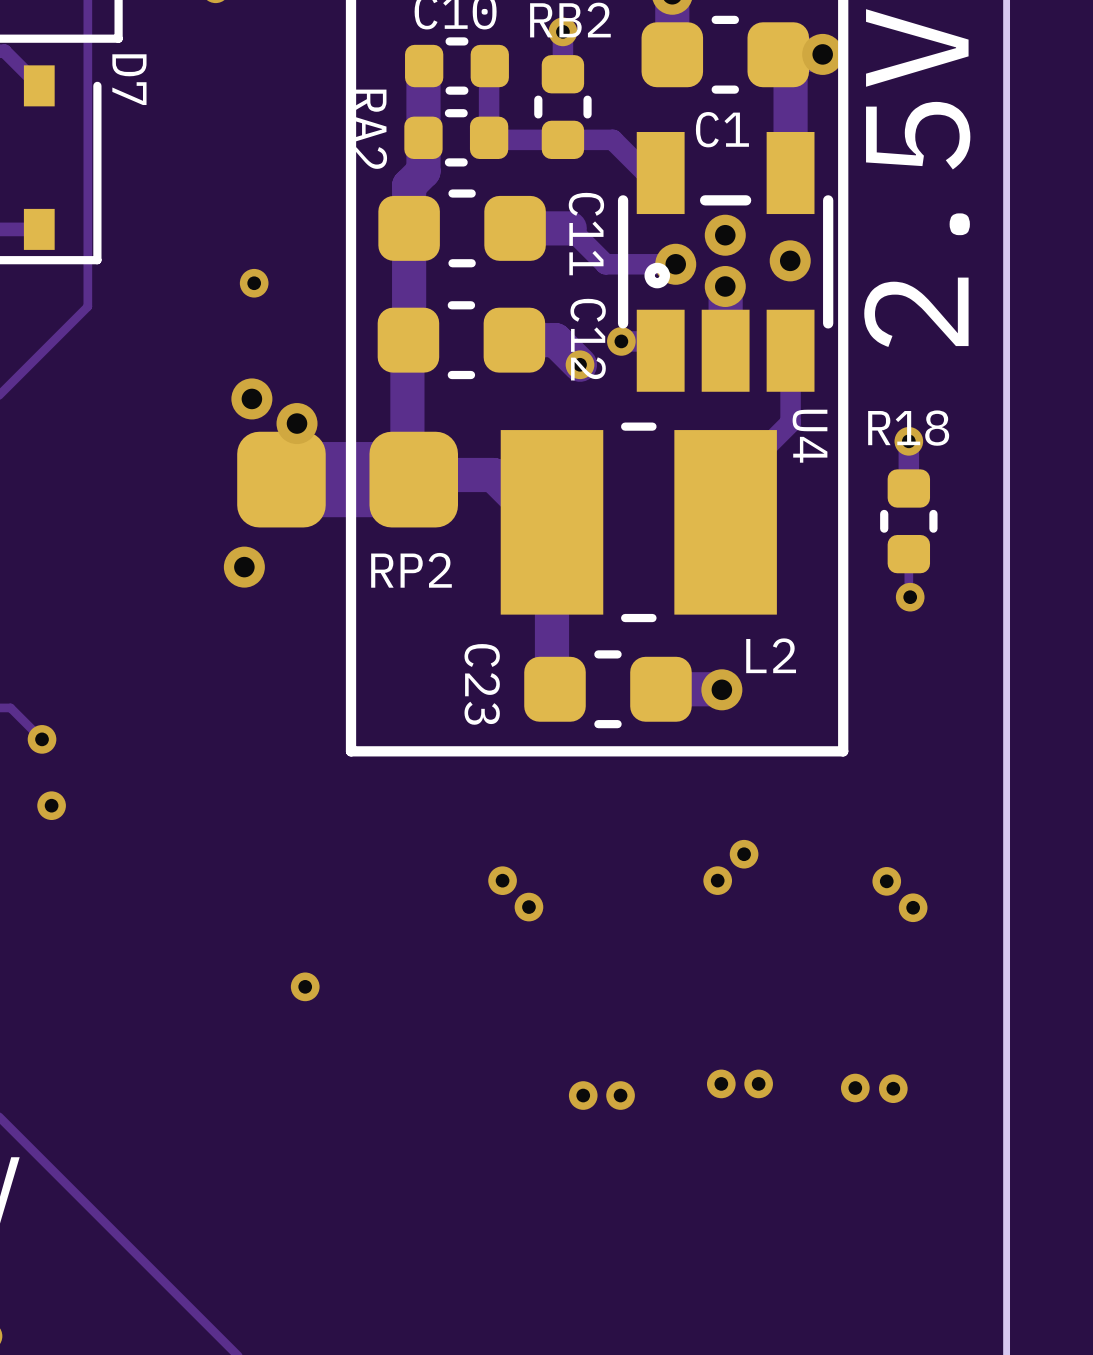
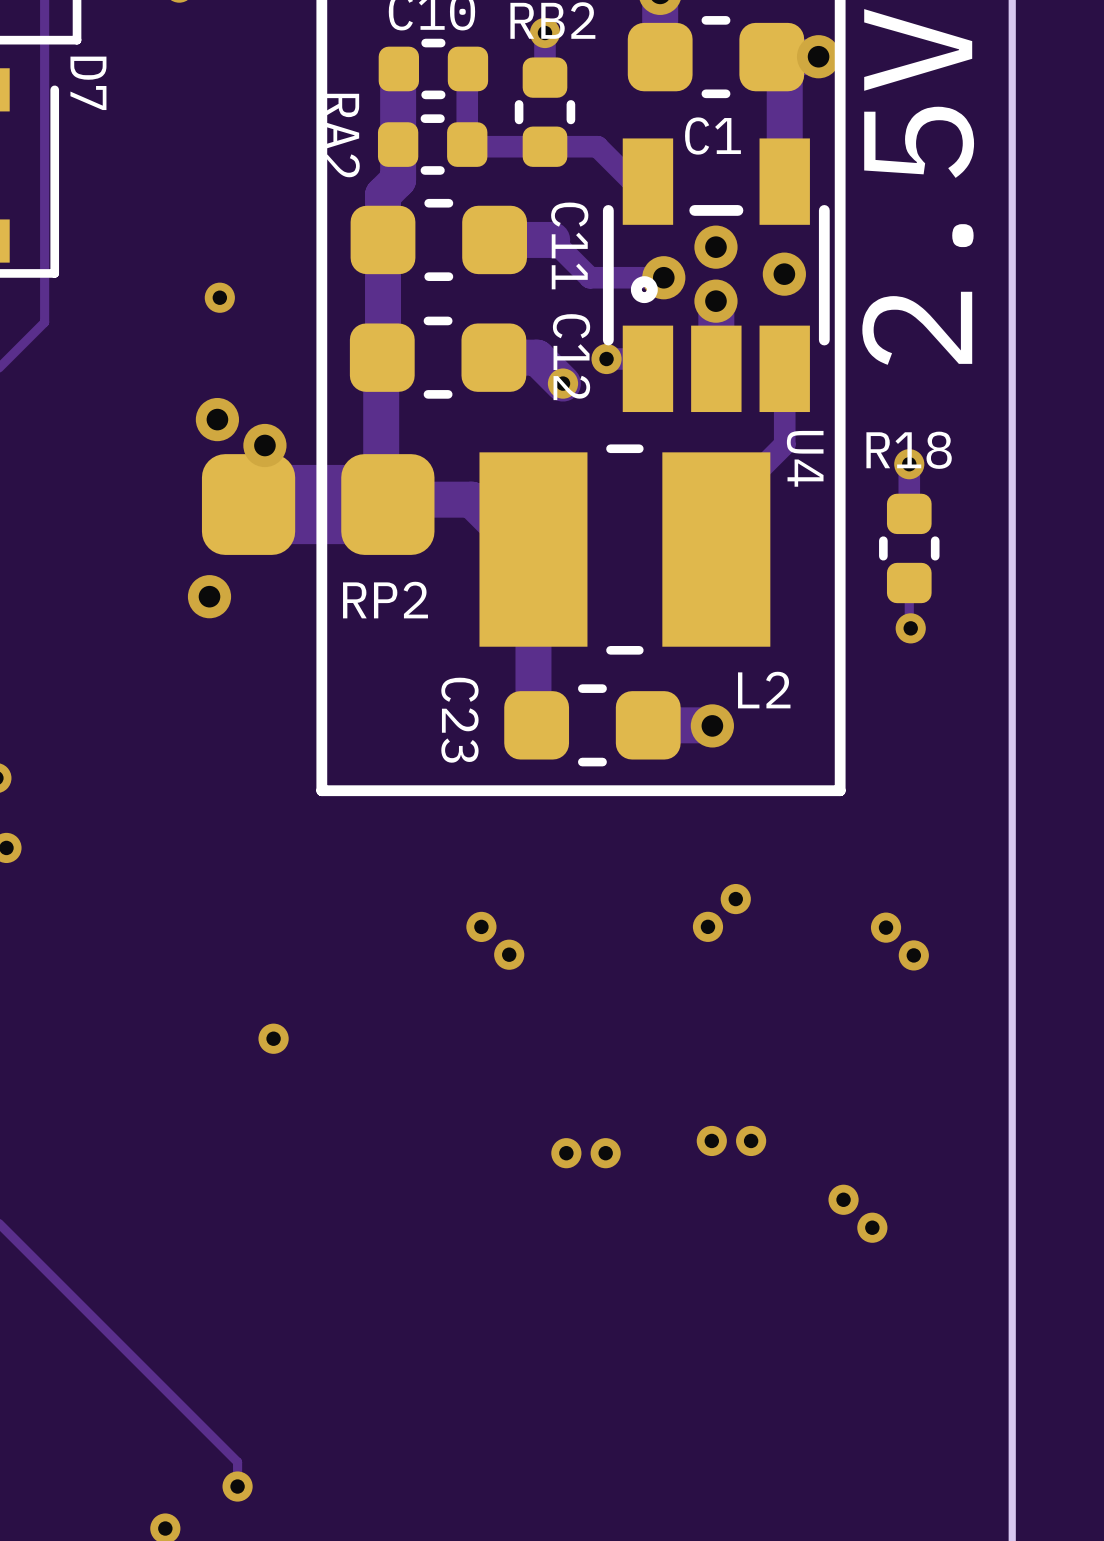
via: (855, 1088) -> none
via: (893, 1088) -> none
via: none -> (843, 1199)
via: none -> (872, 1227)

